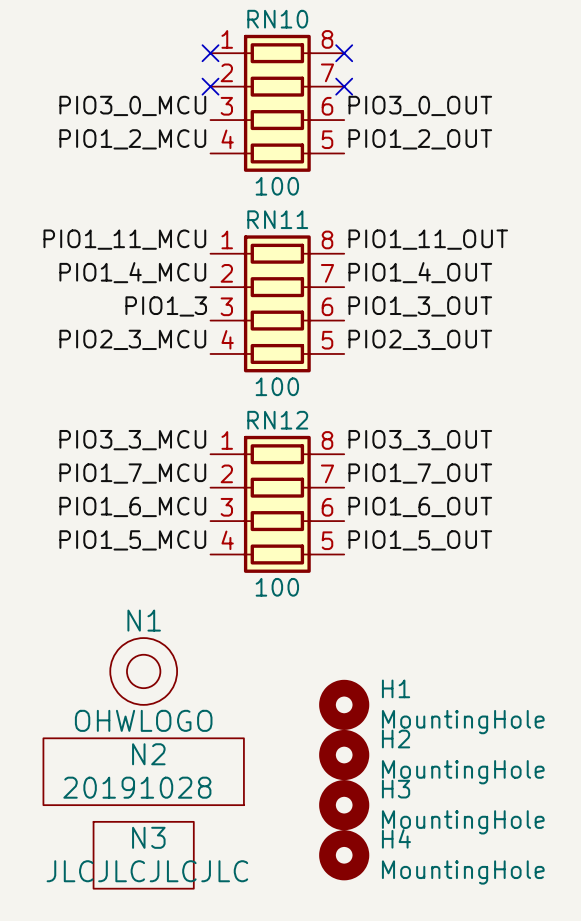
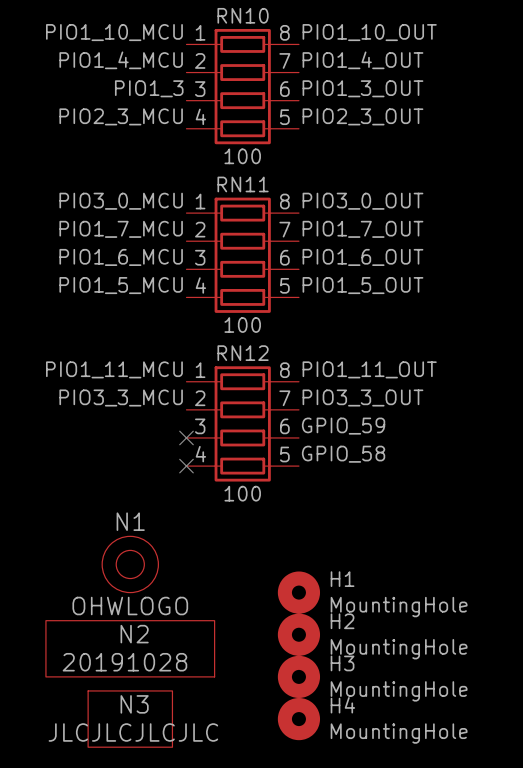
label: none -> PIO1_10_MCU (114, 32)
label: none -> PIO1_10_OUT (369, 32)
no-connect mark: (210, 53) -> none
no-connect mark: (344, 53) -> none
label: none -> PIO1_4_MCU (121, 60)
label: none -> PIO1_4_OUT (362, 60)
no-connect mark: (210, 86) -> none
no-connect mark: (344, 86) -> none
label: PIO3_0_MCU (132, 105) -> PIO1_3 (149, 88)
label: PIO3_0_OUT (420, 105) -> PIO1_3_OUT (362, 88)
label: PIO1_2_MCU (132, 139) -> PIO2_3_MCU (121, 116)
label: PIO1_2_OUT (420, 139) -> PIO2_3_OUT (362, 116)
label: PIO1_11_MCU (124, 239) -> PIO3_0_MCU (121, 201)
label: PIO1_11_OUT (428, 239) -> PIO3_0_OUT (362, 201)
label: PIO1_4_MCU (132, 272) -> PIO1_7_MCU (121, 229)
label: PIO1_4_OUT (420, 272) -> PIO1_7_OUT (362, 229)
label: PIO1_3 (166, 306) -> PIO1_6_MCU (121, 257)
label: PIO1_3_OUT (420, 306) -> PIO1_6_OUT (362, 257)
label: PIO2_3_MCU (132, 339) -> PIO1_5_MCU (121, 285)
label: PIO2_3_OUT (420, 339) -> PIO1_5_OUT (362, 285)
label: PIO3_3_MCU (132, 440) -> PIO1_11_MCU (114, 369)
label: PIO3_3_OUT (420, 440) -> PIO1_11_OUT (369, 369)
label: PIO1_7_MCU (132, 473) -> PIO3_3_MCU (121, 397)
label: PIO1_7_OUT (420, 473) -> PIO3_3_OUT (362, 397)
label: PIO1_6_MCU (132, 506) -> none
label: PIO1_6_OUT (420, 506) -> GPIO_59 (343, 426)
no-connect mark: none -> (186, 437)
label: PIO1_5_MCU (132, 540) -> none
label: PIO1_5_OUT (420, 540) -> GPIO_58 (343, 454)
no-connect mark: none -> (186, 466)

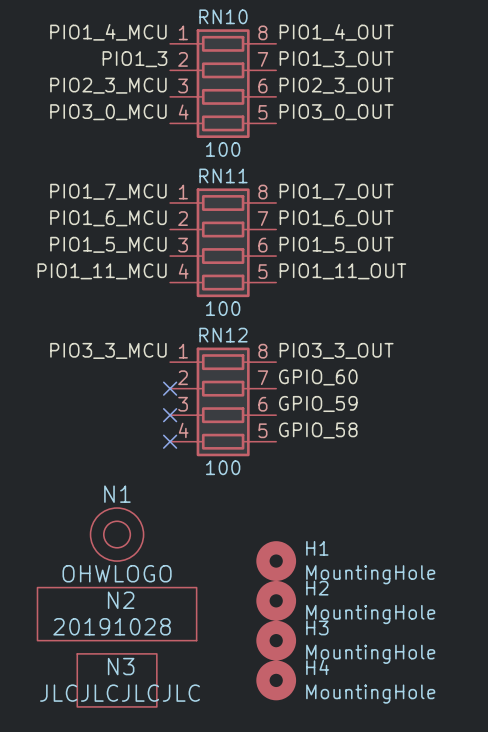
label: PIO1_10_MCU (114, 32) -> PIO1_4_MCU (108, 32)
label: PIO1_10_OUT (369, 32) -> PIO1_4_OUT (336, 32)
label: PIO1_4_MCU (121, 60) -> PIO1_3 (134, 59)
label: PIO1_4_OUT (362, 60) -> PIO1_3_OUT (336, 59)
label: PIO1_3 (149, 88) -> PIO2_3_MCU (108, 85)
label: PIO1_3_OUT (362, 88) -> PIO2_3_OUT (336, 85)
label: PIO2_3_MCU (121, 116) -> PIO3_0_MCU (108, 112)
label: PIO2_3_OUT (362, 116) -> PIO3_0_OUT (336, 112)
label: PIO3_0_MCU (121, 201) -> PIO1_7_MCU (108, 191)
label: PIO3_0_OUT (362, 201) -> PIO1_7_OUT (336, 191)
label: PIO1_7_MCU (121, 229) -> PIO1_6_MCU (108, 218)
label: PIO1_7_OUT (362, 229) -> PIO1_6_OUT (336, 218)
label: PIO1_6_MCU (121, 257) -> PIO1_5_MCU (108, 244)
label: PIO1_6_OUT (362, 257) -> PIO1_5_OUT (336, 244)
label: PIO1_5_MCU (121, 285) -> PIO1_11_MCU (102, 271)
label: PIO1_5_OUT (362, 285) -> PIO1_11_OUT (342, 271)
label: PIO1_11_MCU (114, 369) -> PIO3_3_MCU (108, 350)
label: PIO1_11_OUT (369, 369) -> PIO3_3_OUT (336, 350)
label: PIO3_3_MCU (121, 397) -> none
label: PIO3_3_OUT (362, 397) -> GPIO_60 (318, 377)
no-connect mark: none -> (170, 388)

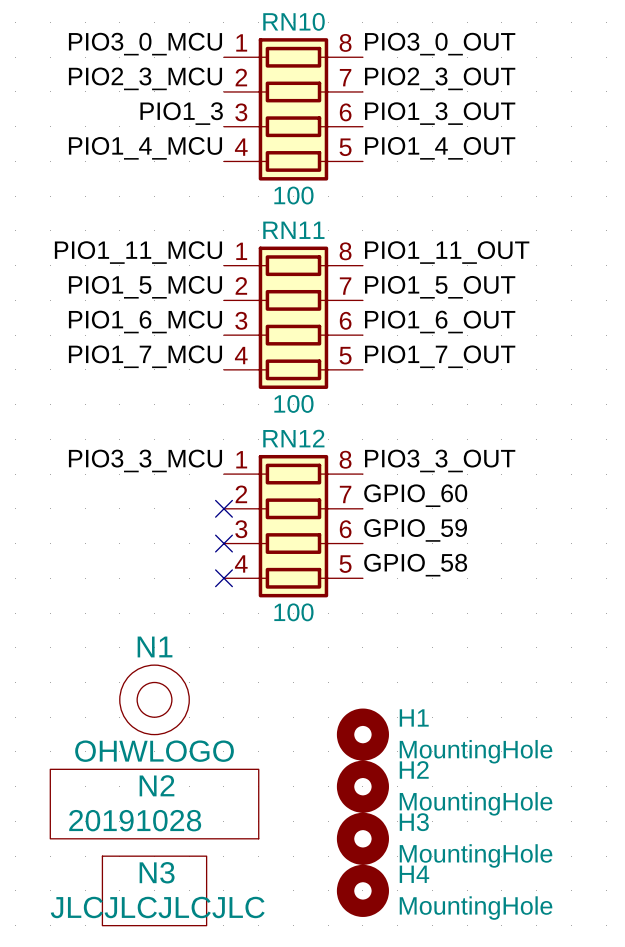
label: PIO1_4_MCU (108, 32) -> PIO3_0_MCU (145, 44)
label: PIO1_4_OUT (336, 32) -> PIO3_0_OUT (440, 44)
label: PIO1_3 (134, 59) -> PIO2_3_MCU (145, 78)
label: PIO1_3_OUT (336, 59) -> PIO2_3_OUT (440, 78)
label: PIO2_3_MCU (108, 85) -> PIO1_3 (181, 113)
label: PIO2_3_OUT (336, 85) -> PIO1_3_OUT (440, 113)
label: PIO3_0_MCU (108, 112) -> PIO1_4_MCU (145, 148)
label: PIO3_0_OUT (336, 112) -> PIO1_4_OUT (440, 148)
label: PIO1_7_MCU (108, 191) -> PIO1_11_MCU (138, 252)
label: PIO1_7_OUT (336, 191) -> PIO1_11_OUT (447, 252)
label: PIO1_6_MCU (108, 218) -> PIO1_5_MCU (145, 287)
label: PIO1_6_OUT (336, 218) -> PIO1_5_OUT (440, 287)
label: PIO1_5_MCU (108, 244) -> PIO1_6_MCU (145, 322)
label: PIO1_5_OUT (336, 244) -> PIO1_6_OUT (440, 322)
label: PIO1_11_MCU (102, 271) -> PIO1_7_MCU (145, 356)
label: PIO1_11_OUT (342, 271) -> PIO1_7_OUT (440, 356)

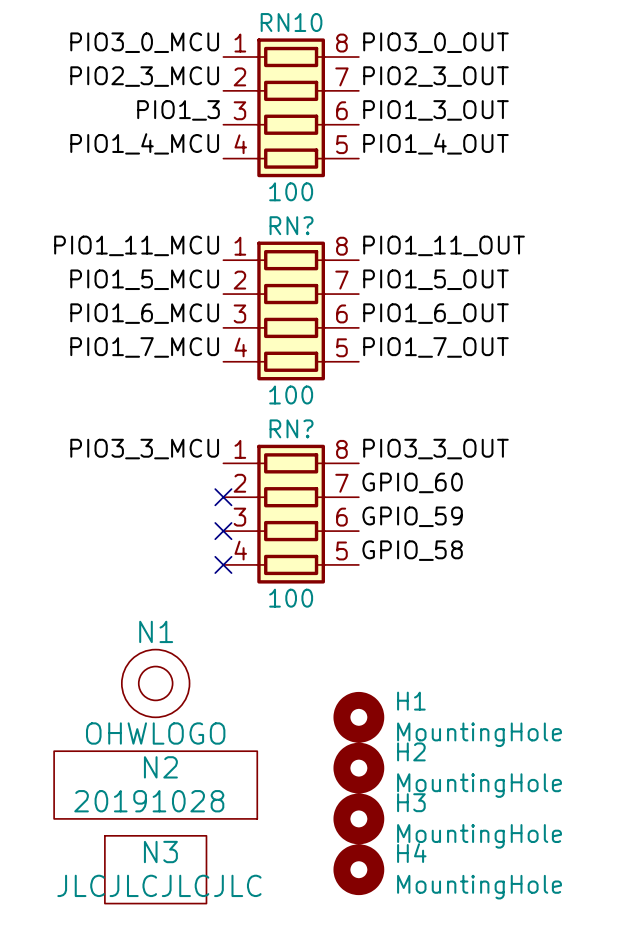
RN11 name: RN11 (293, 230) -> RN? (291, 225)
RN12 name: RN12 (293, 438) -> RN? (291, 428)

